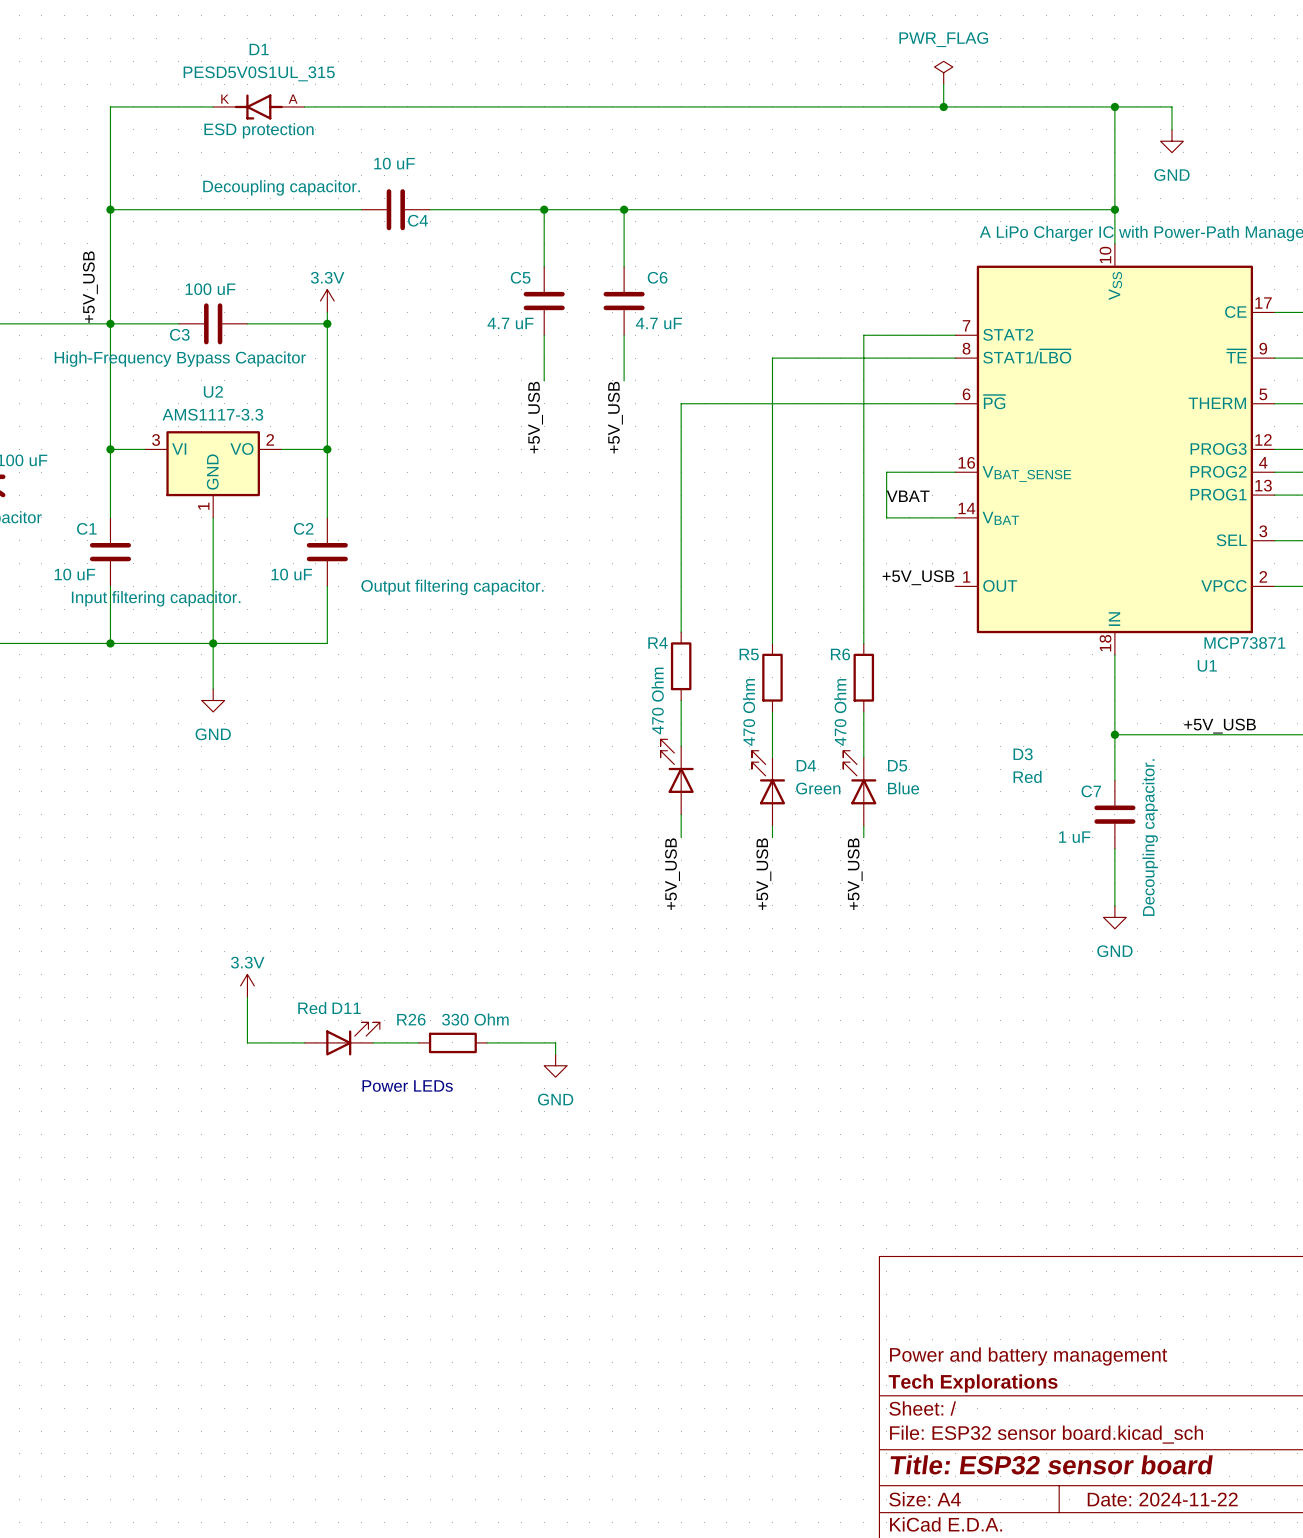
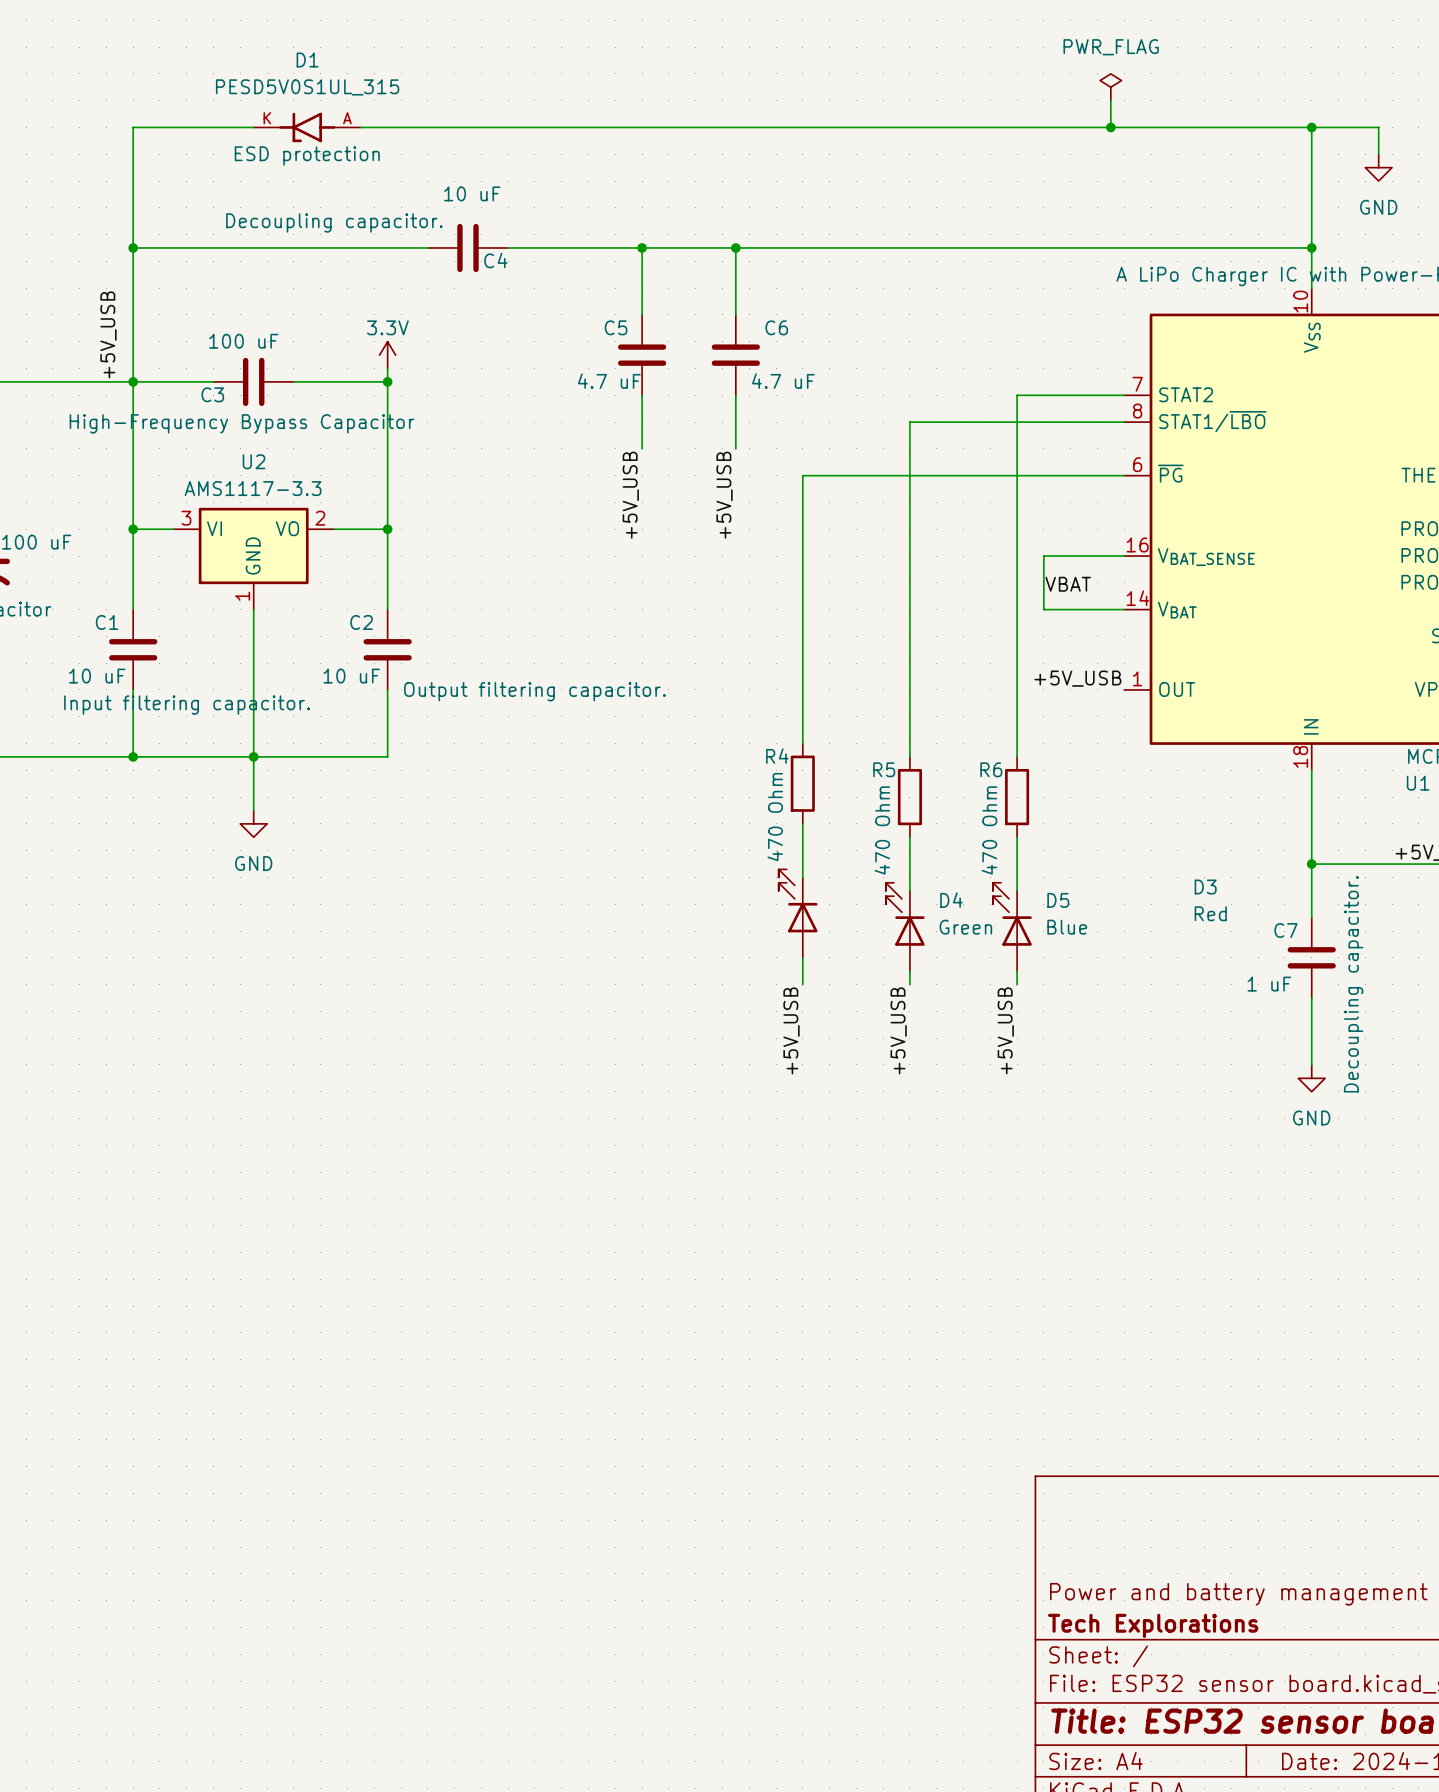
power symbol: 3.3V (247, 985) -> none
wire: (247, 997) (247, 1042) (304, 1042) -> none
D11: Red (342, 1038) -> none
wire: (372, 1042) (418, 1042) -> none
R26: 330 Ohm (452, 1042) -> none
wire: (487, 1042) (555, 1042) (555, 1054) -> none
power symbol: GND (555, 1065) -> none
text: Power LEDs (407, 1086) -> none

